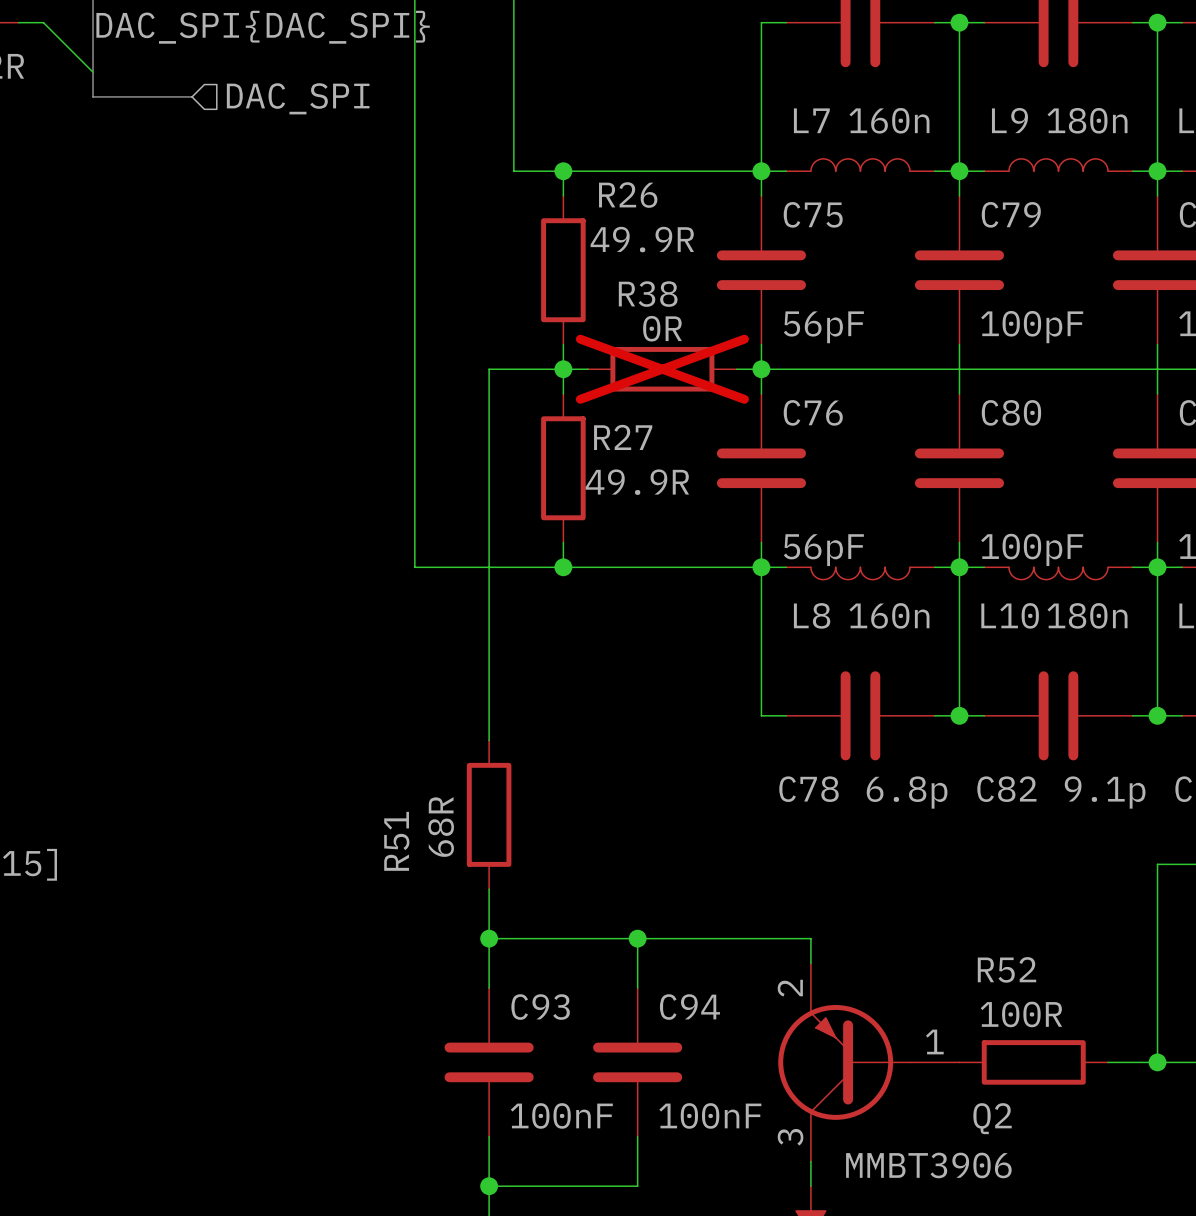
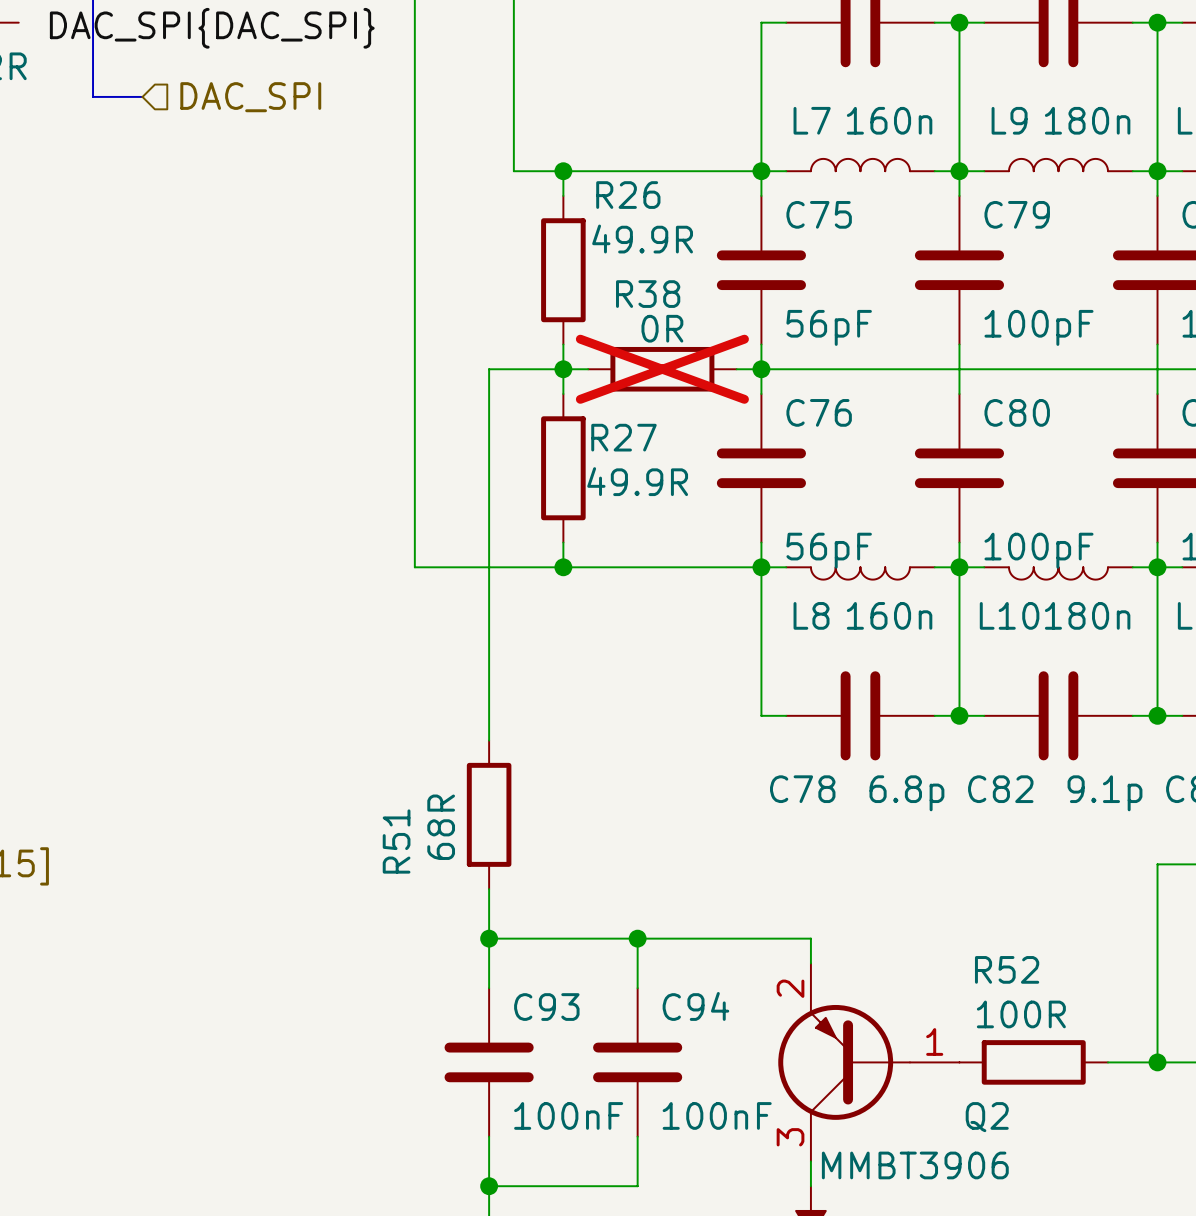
wire: (18, 22) (43, 22) (93, 72) -> none
label position: DAC_SPI{DAC_SPI} (263, 27) -> DAC_SPI{DAC_SPI} (212, 28)
bus: (142, 96) (192, 96) -> none
hierarchical label position: DAC_SPI (298, 98) -> DAC_SPI (250, 97)

